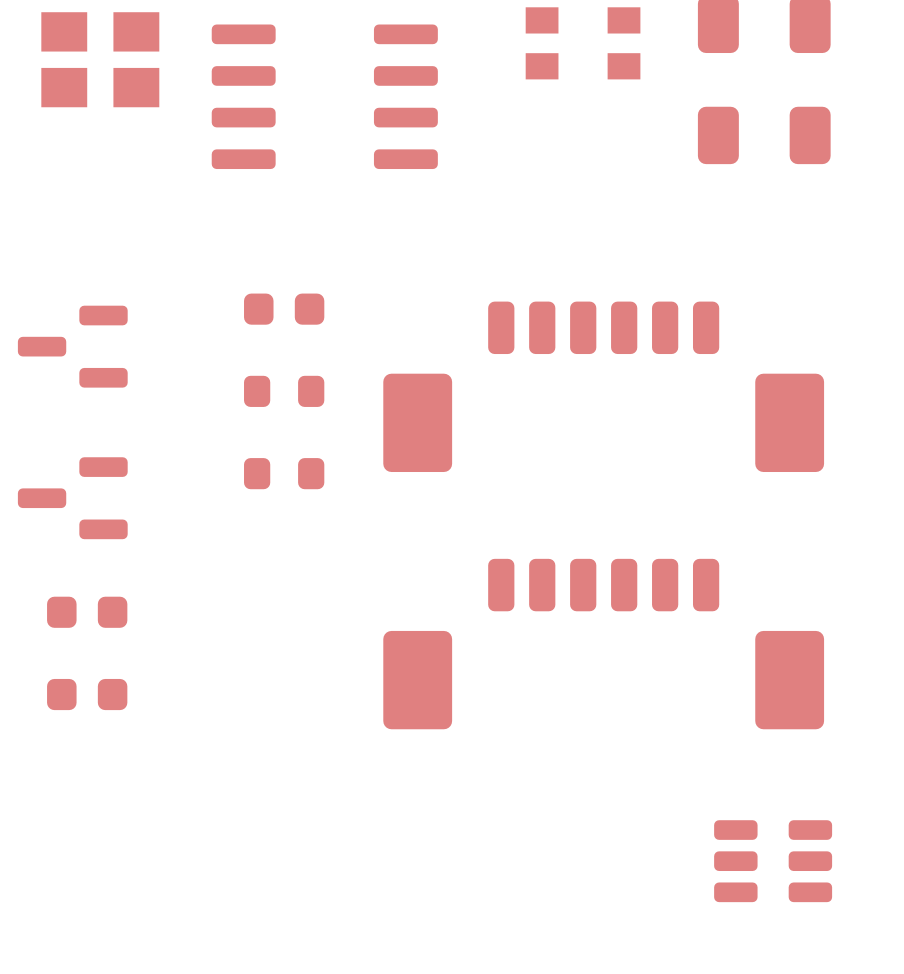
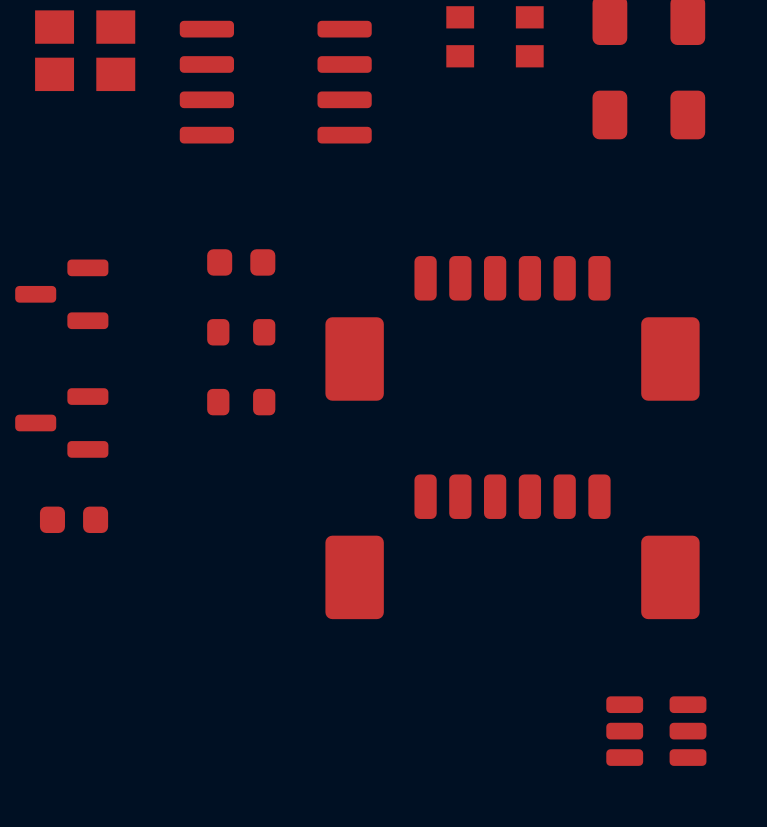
part: (87, 694) -> none

